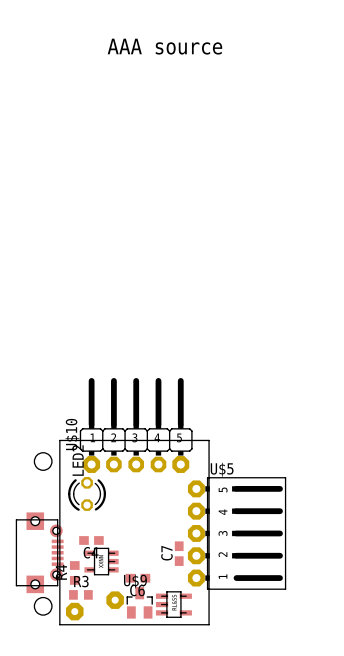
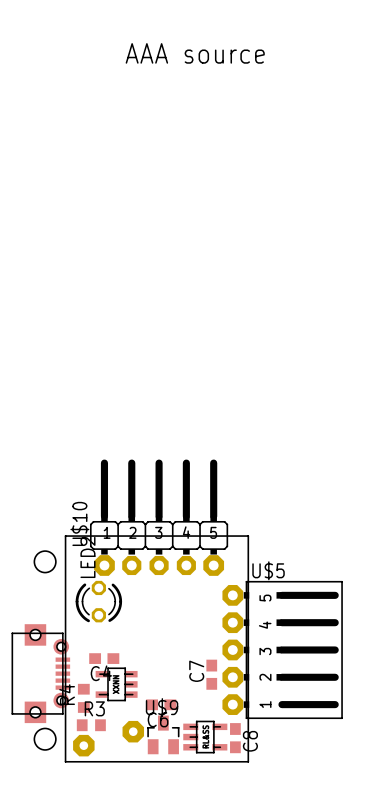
C8: none -> (235, 738)

